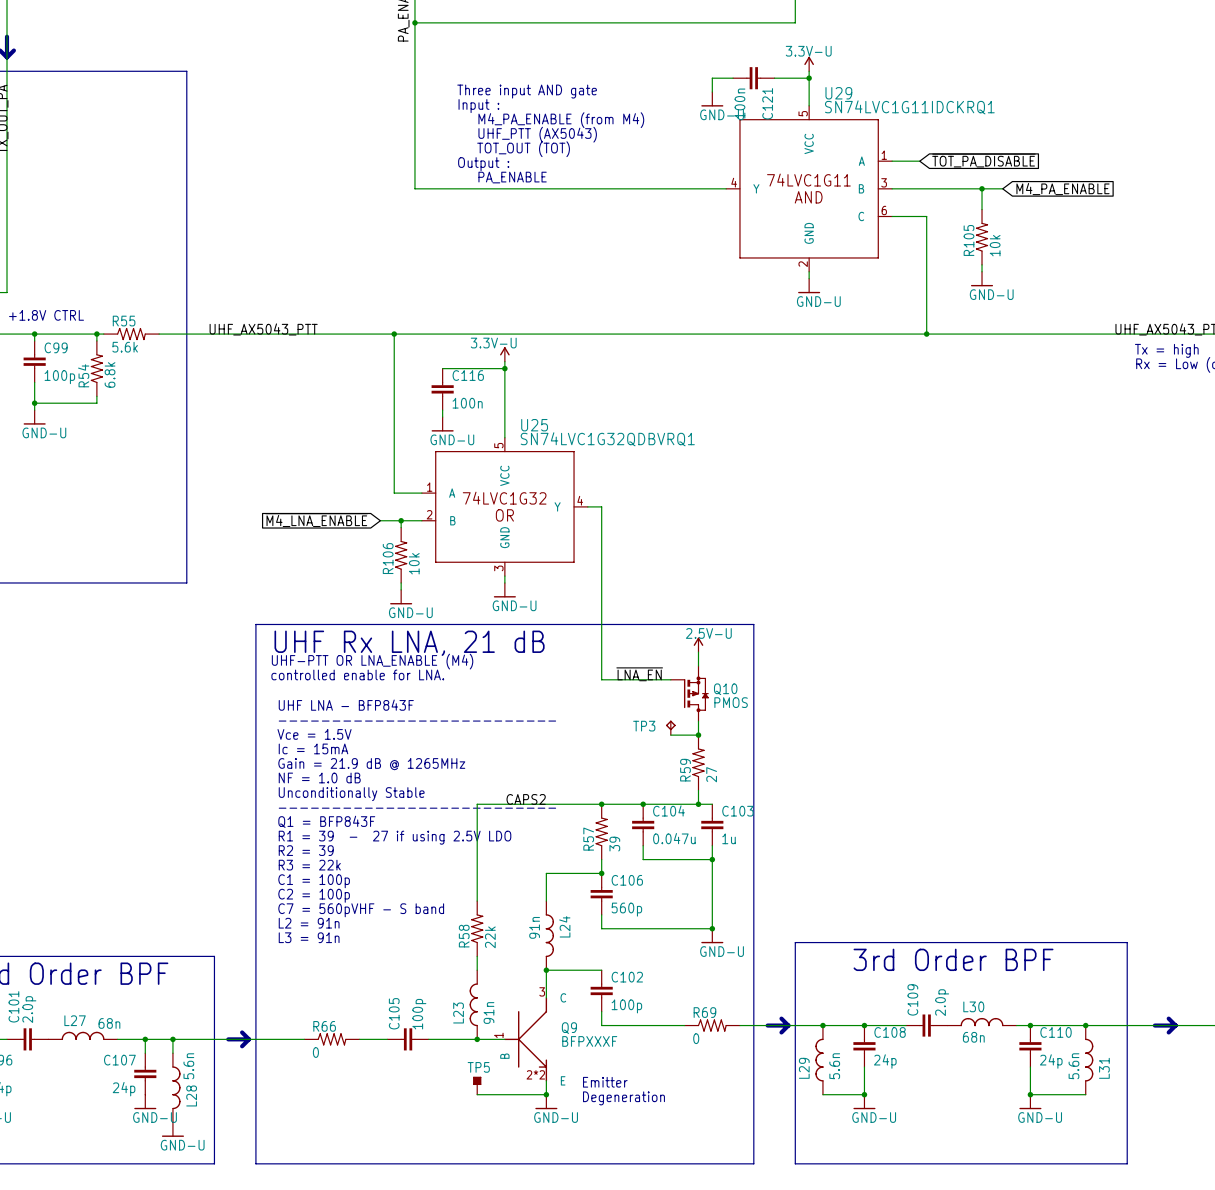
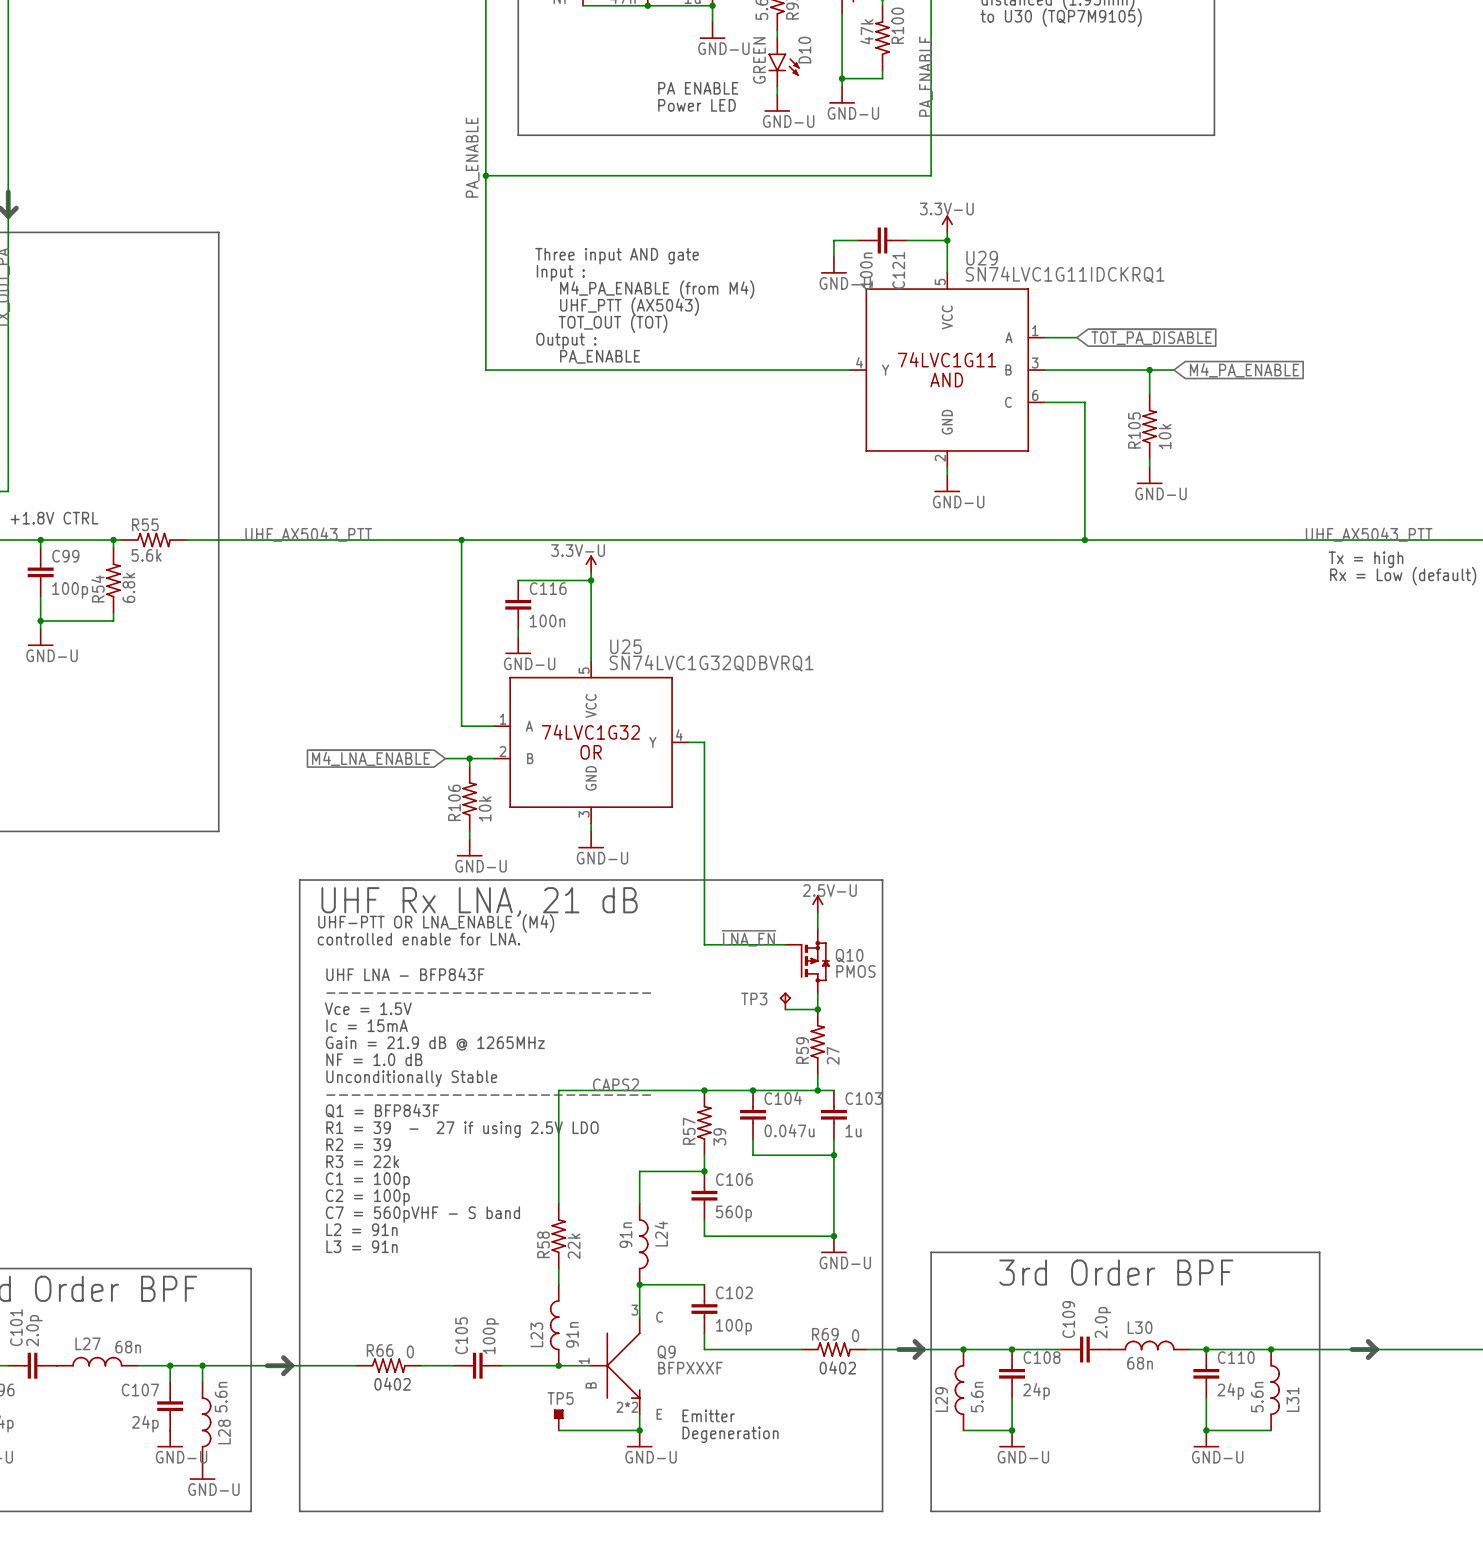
R69 value position: 0 (696, 1038) -> 0 (855, 1335)
text: none -> 0402 (837, 1367)
R66 value position: 0 (315, 1052) -> 0 (410, 1351)
text: none -> 0402 (392, 1384)

